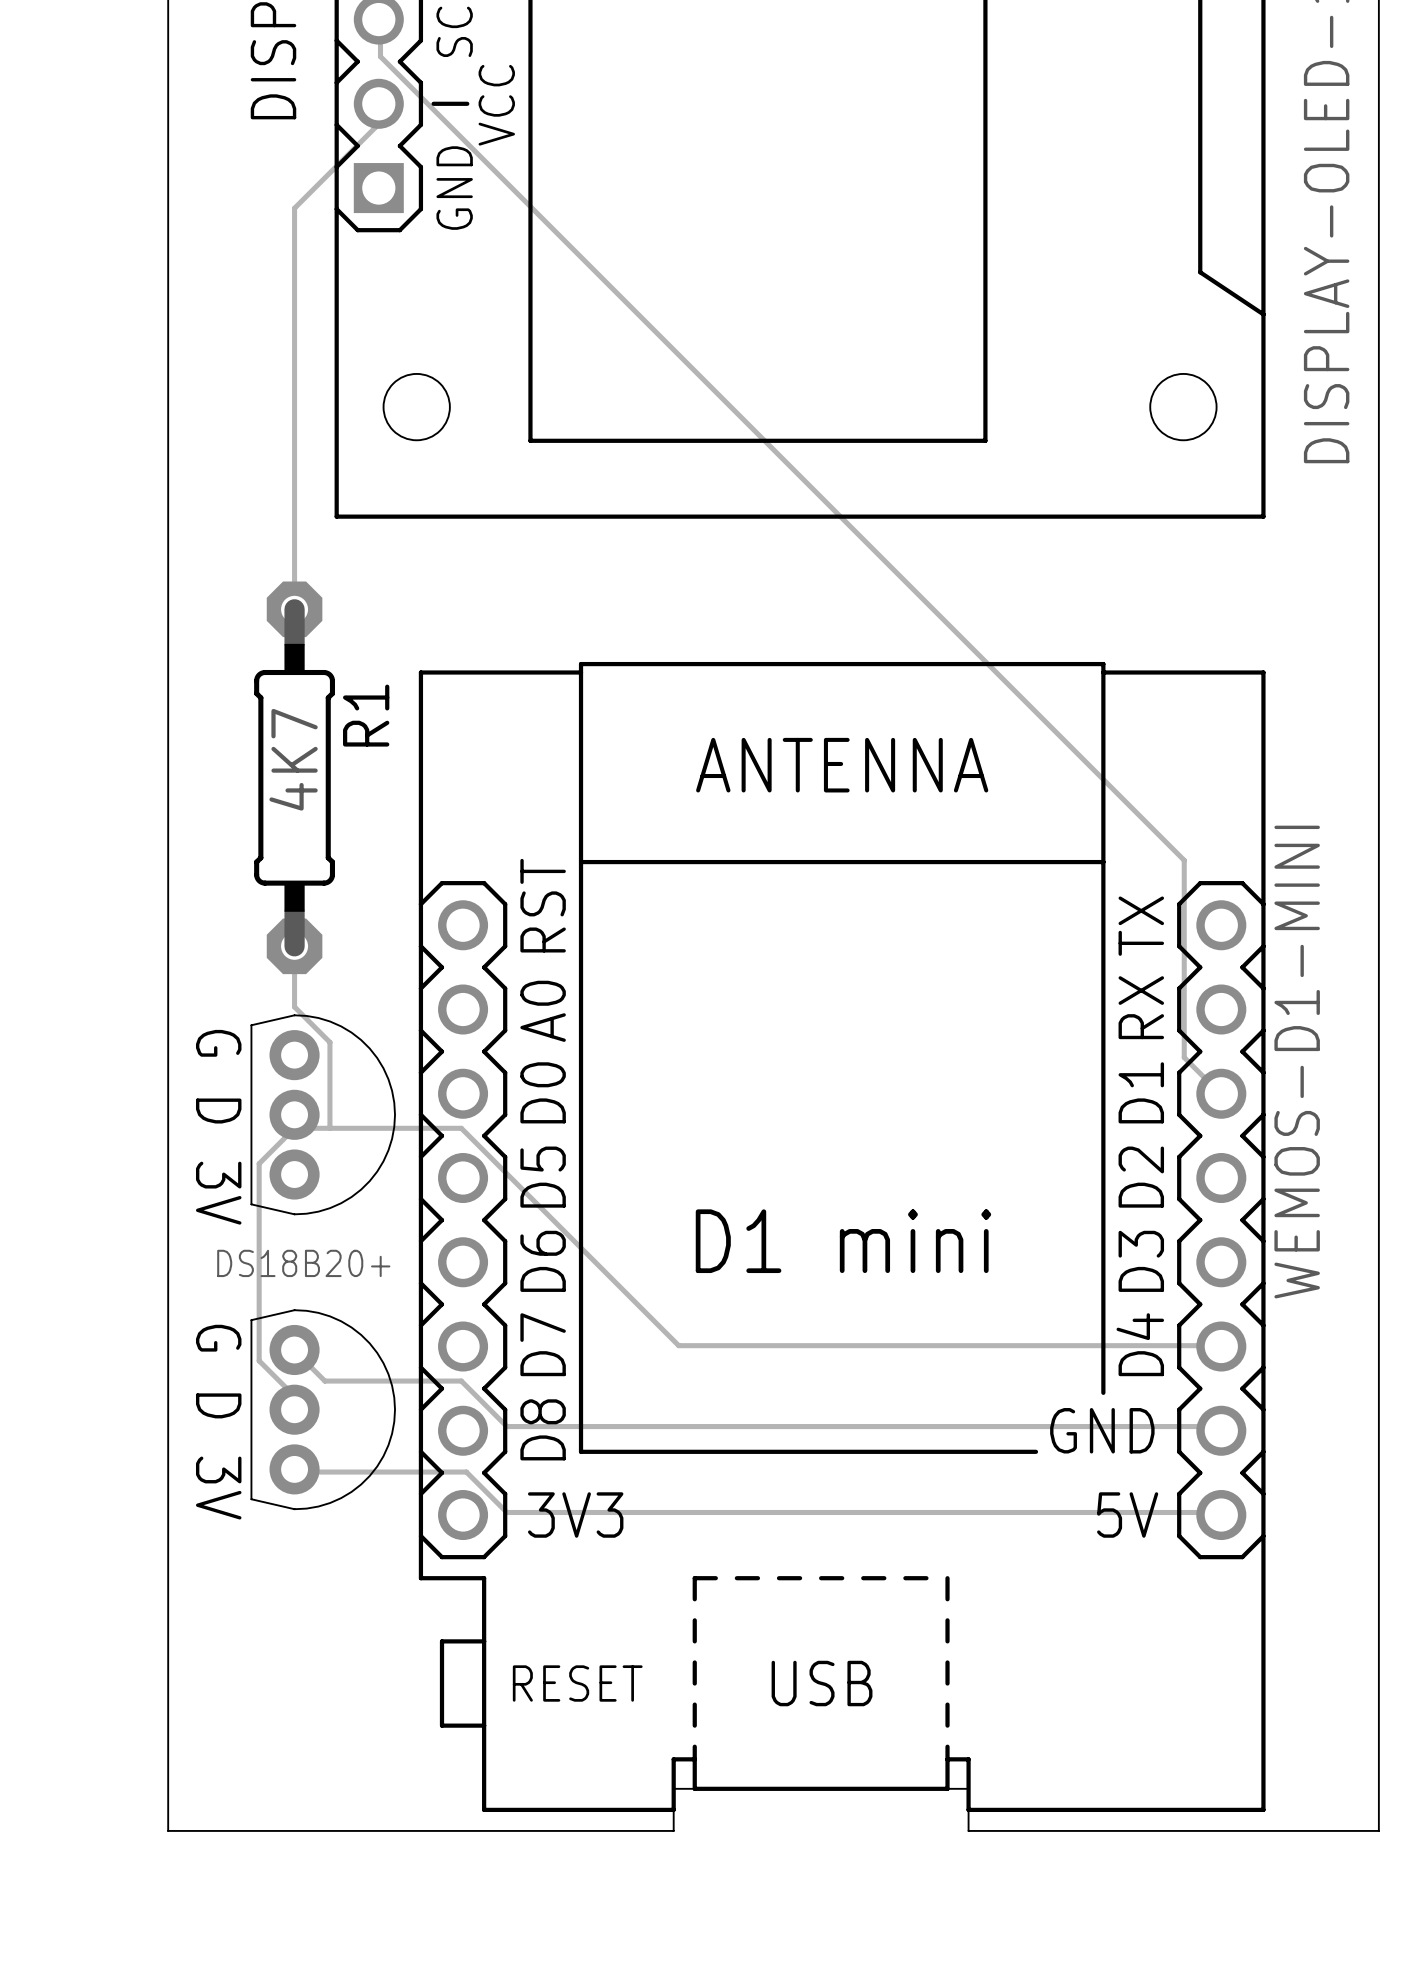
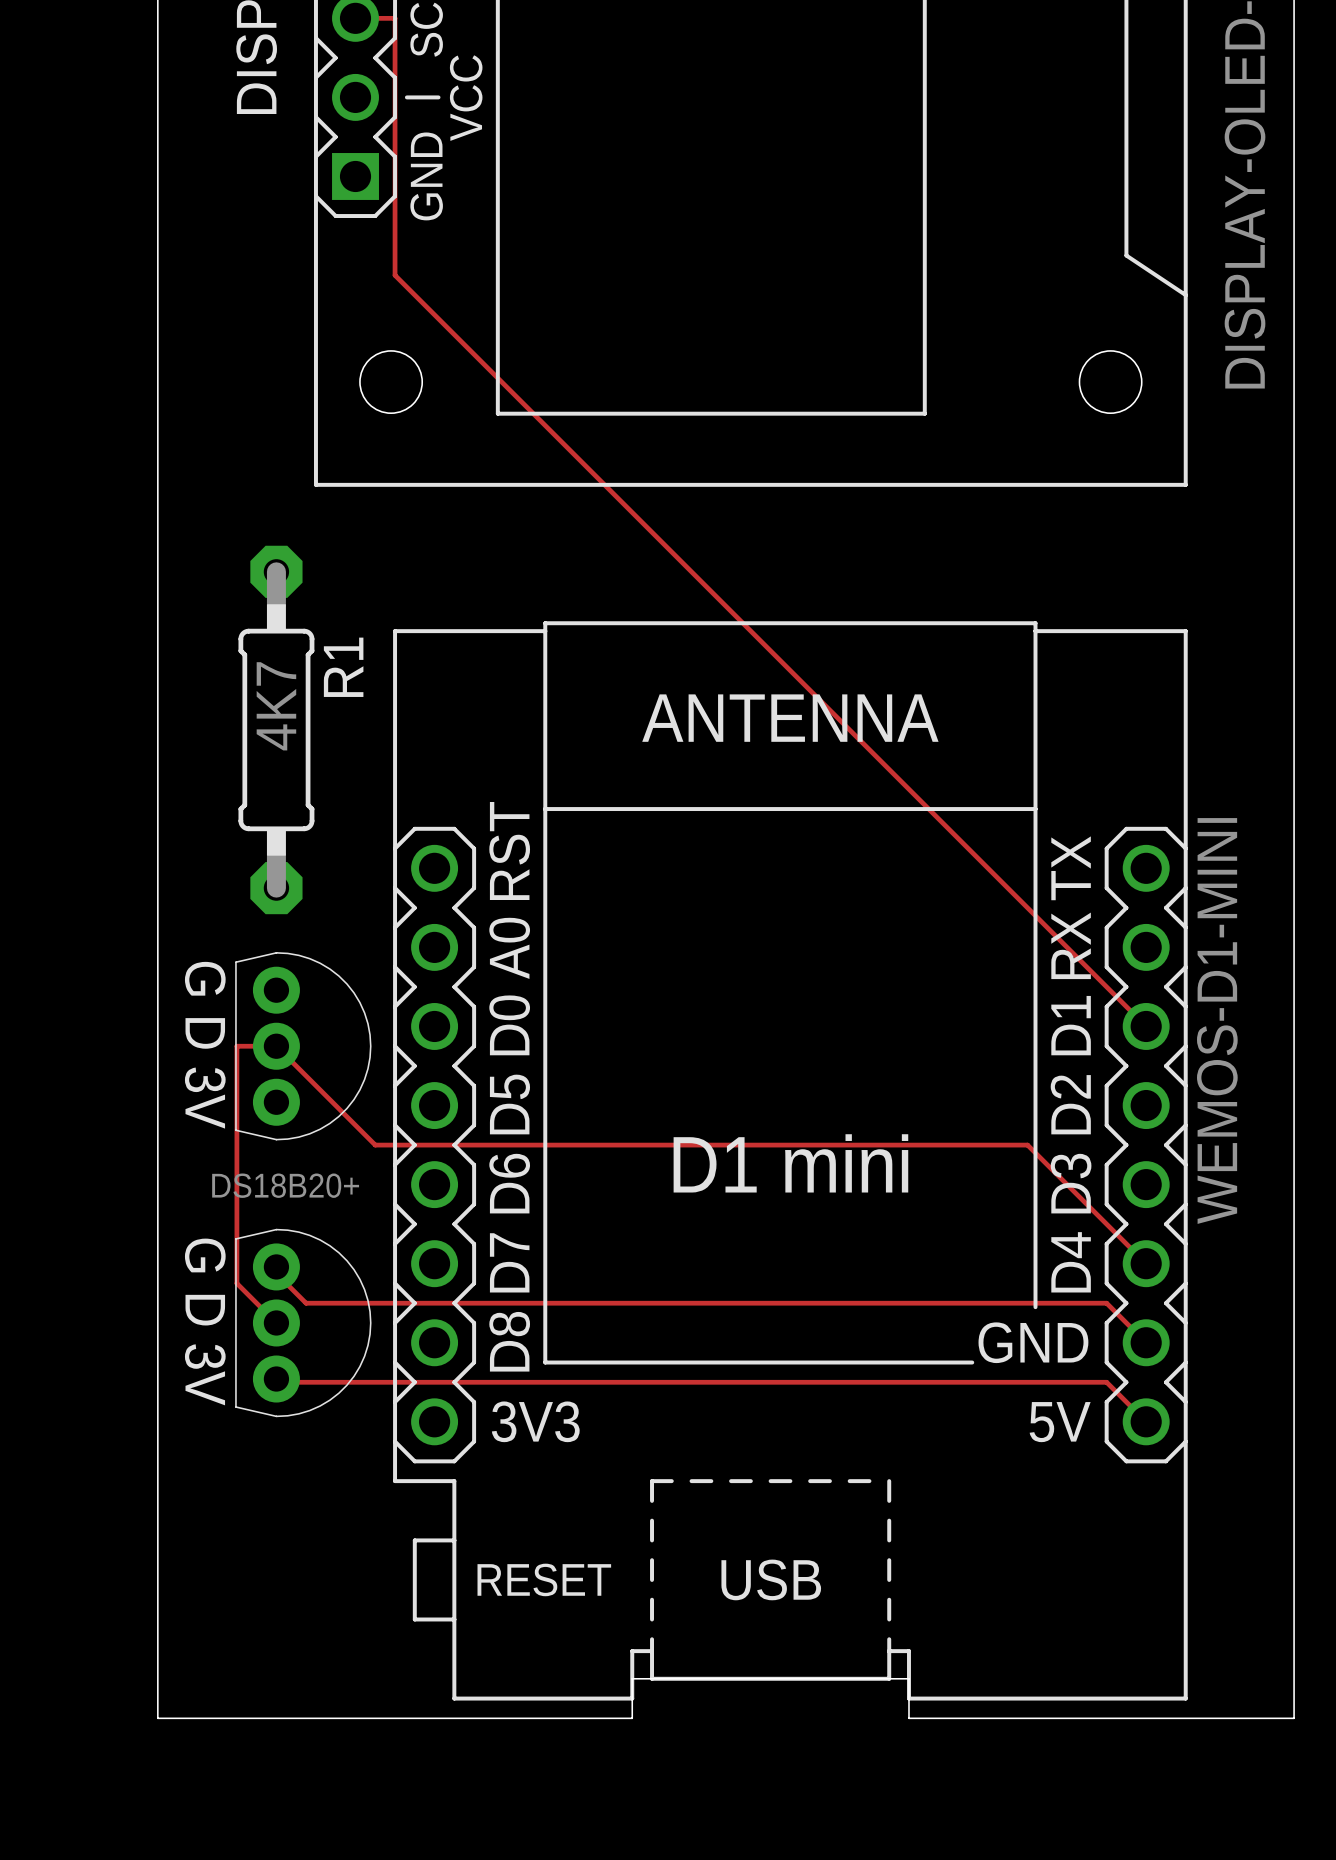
track: (378, 19) (380, 21) (380, 56) (1184, 860) (1184, 1057) (1221, 1093) -> (355, 18) (395, 18) (395, 275) (1146, 1026)
track: (378, 103) (375, 107) (375, 127) (294, 208) (294, 609) -> none
track: (294, 946) (294, 1006) (329, 1042) (329, 1128) -> none
track: (1221, 1346) (678, 1345) (461, 1128) (304, 1128) (294, 1118) (294, 1114) (299, 1123) (259, 1163) (259, 1360) (294, 1396) (294, 1409) -> (1146, 1263) (1027, 1145) (375, 1145) (276, 1046) (236, 1046) (236, 1283) (276, 1322)
track: (294, 1350) (324, 1381) (461, 1381) (506, 1426) (1219, 1426) (1221, 1430) -> (276, 1267) (276, 1273) (306, 1303) (1106, 1303) (1146, 1342)
track: (294, 1472) (466, 1472) (506, 1512) (1219, 1512) (1221, 1515) -> (276, 1381) (1106, 1382) (1146, 1421)

